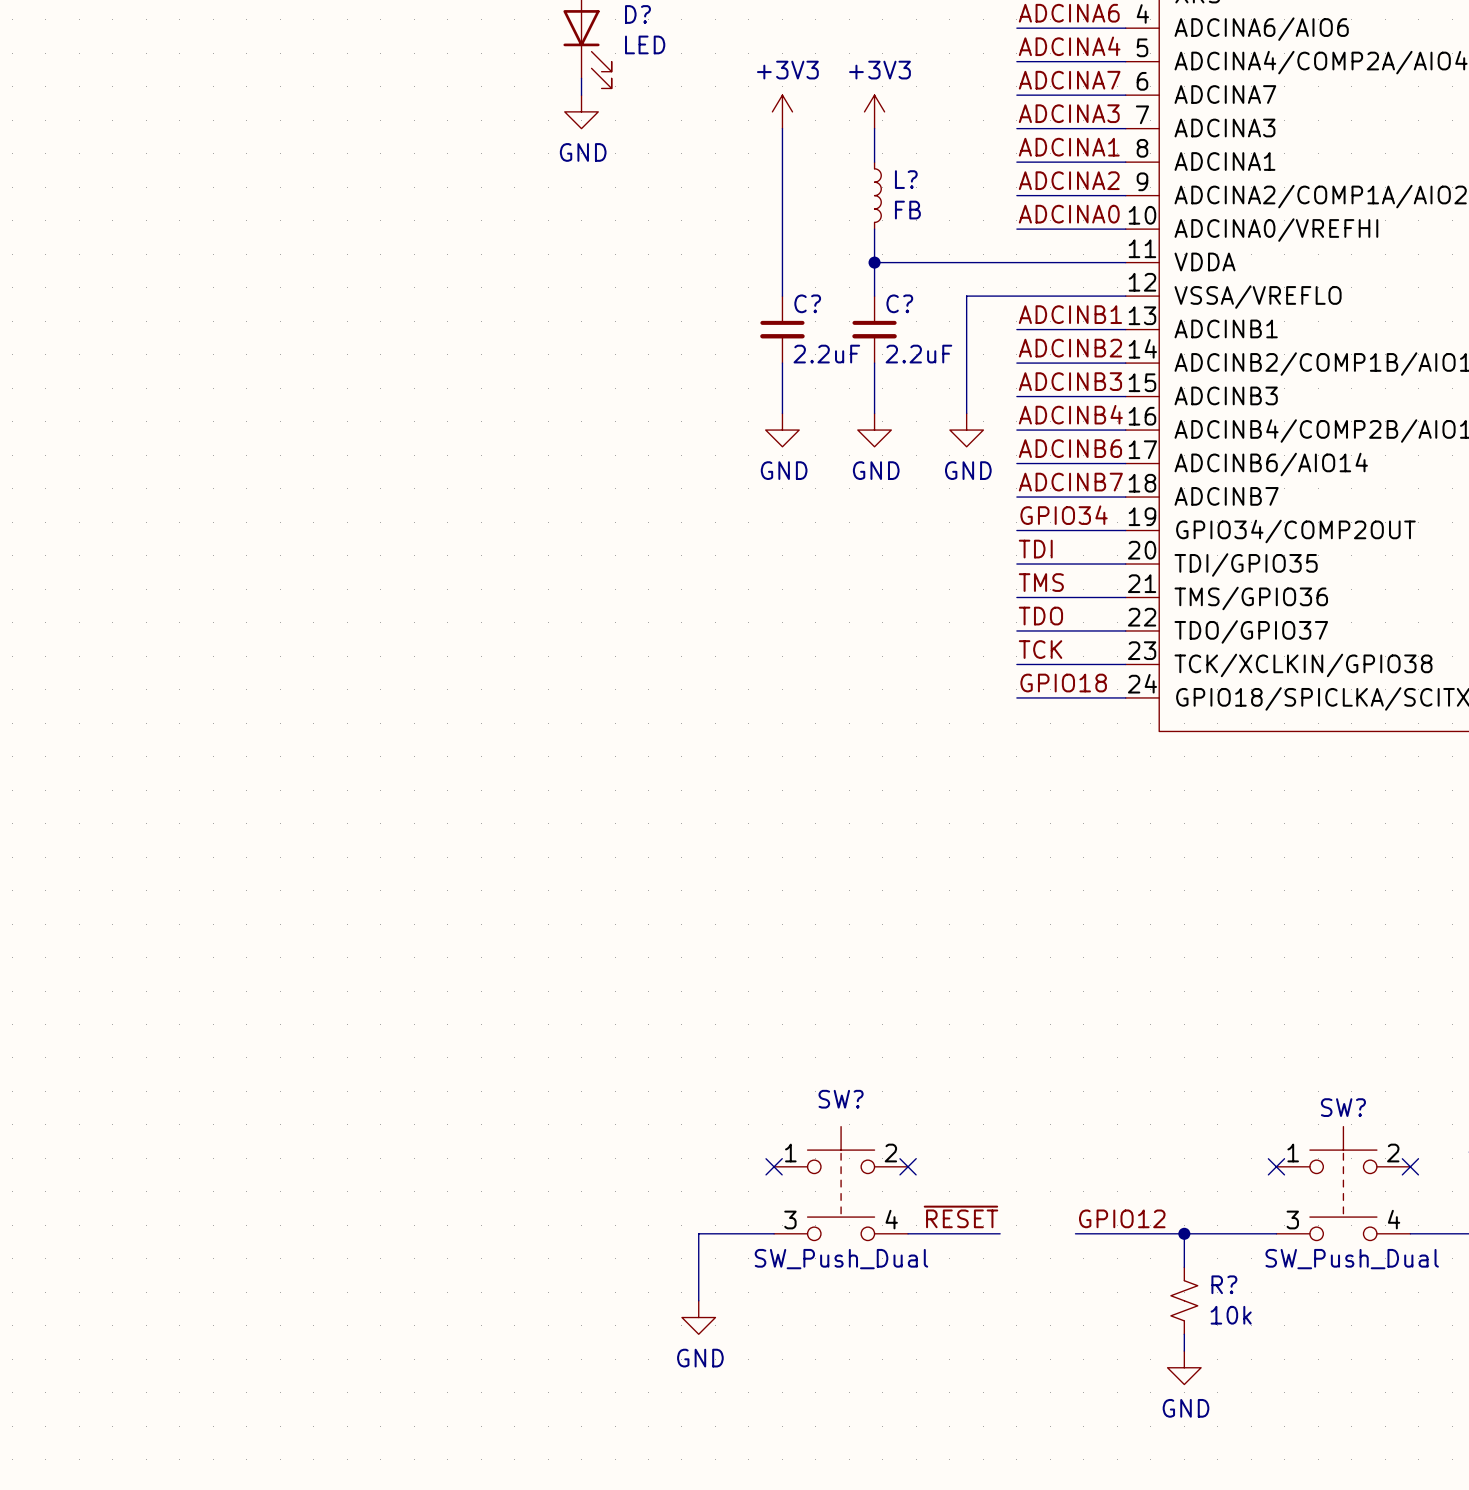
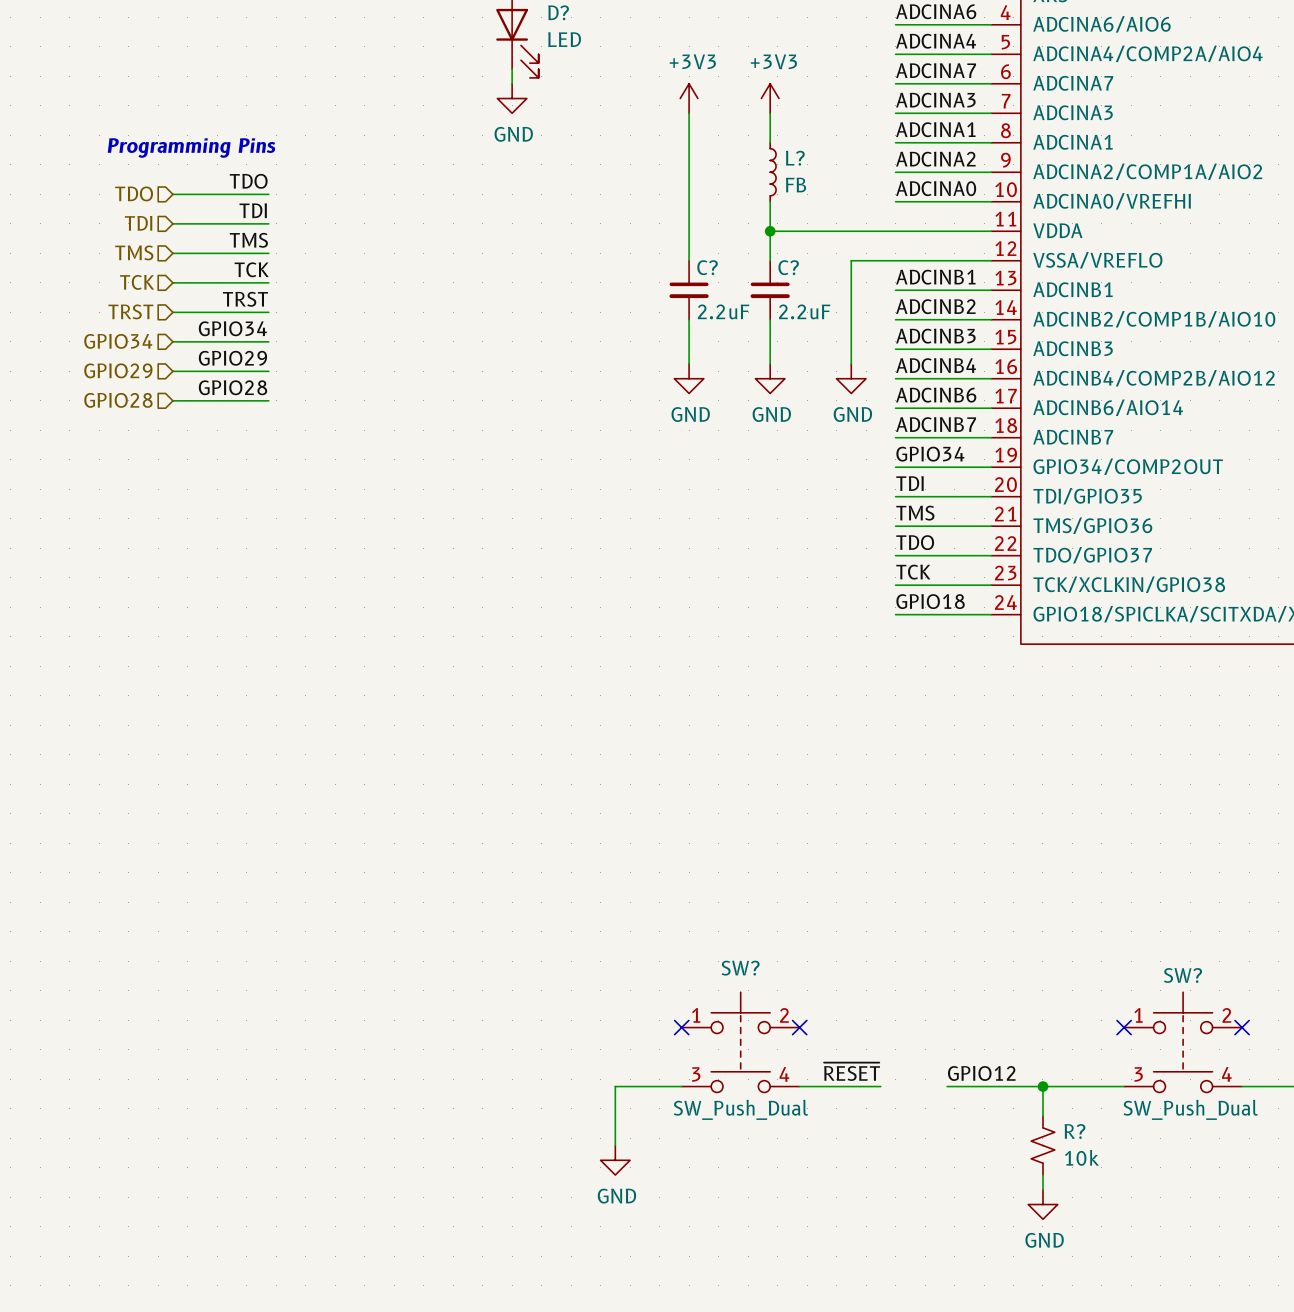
text: none -> Programming Pins (191, 148)
label: none -> TDO (248, 181)
hierarchical label: none -> TDO (134, 193)
wire: none -> (172, 194) (268, 194)
label: none -> TDI (253, 210)
hierarchical label: none -> TDI (138, 223)
wire: none -> (172, 223) (268, 223)
label: none -> TMS (248, 240)
hierarchical label: none -> TMS (134, 252)
wire: none -> (172, 253) (268, 253)
label: none -> TCK (251, 269)
hierarchical label: none -> TCK (137, 282)
wire: none -> (172, 282) (268, 282)
label: none -> TRST (245, 299)
hierarchical label: none -> TRST (130, 311)
wire: none -> (172, 312) (268, 312)
label: none -> GPIO34 (232, 328)
hierarchical label: none -> GPIO34 (118, 341)
wire: none -> (172, 341) (268, 341)
label: none -> GPIO29 (232, 358)
hierarchical label: none -> GPIO29 (118, 370)
wire: none -> (172, 371) (268, 371)
label: none -> GPIO28 (232, 387)
hierarchical label: none -> GPIO28 (118, 400)
wire: none -> (172, 400) (268, 400)

